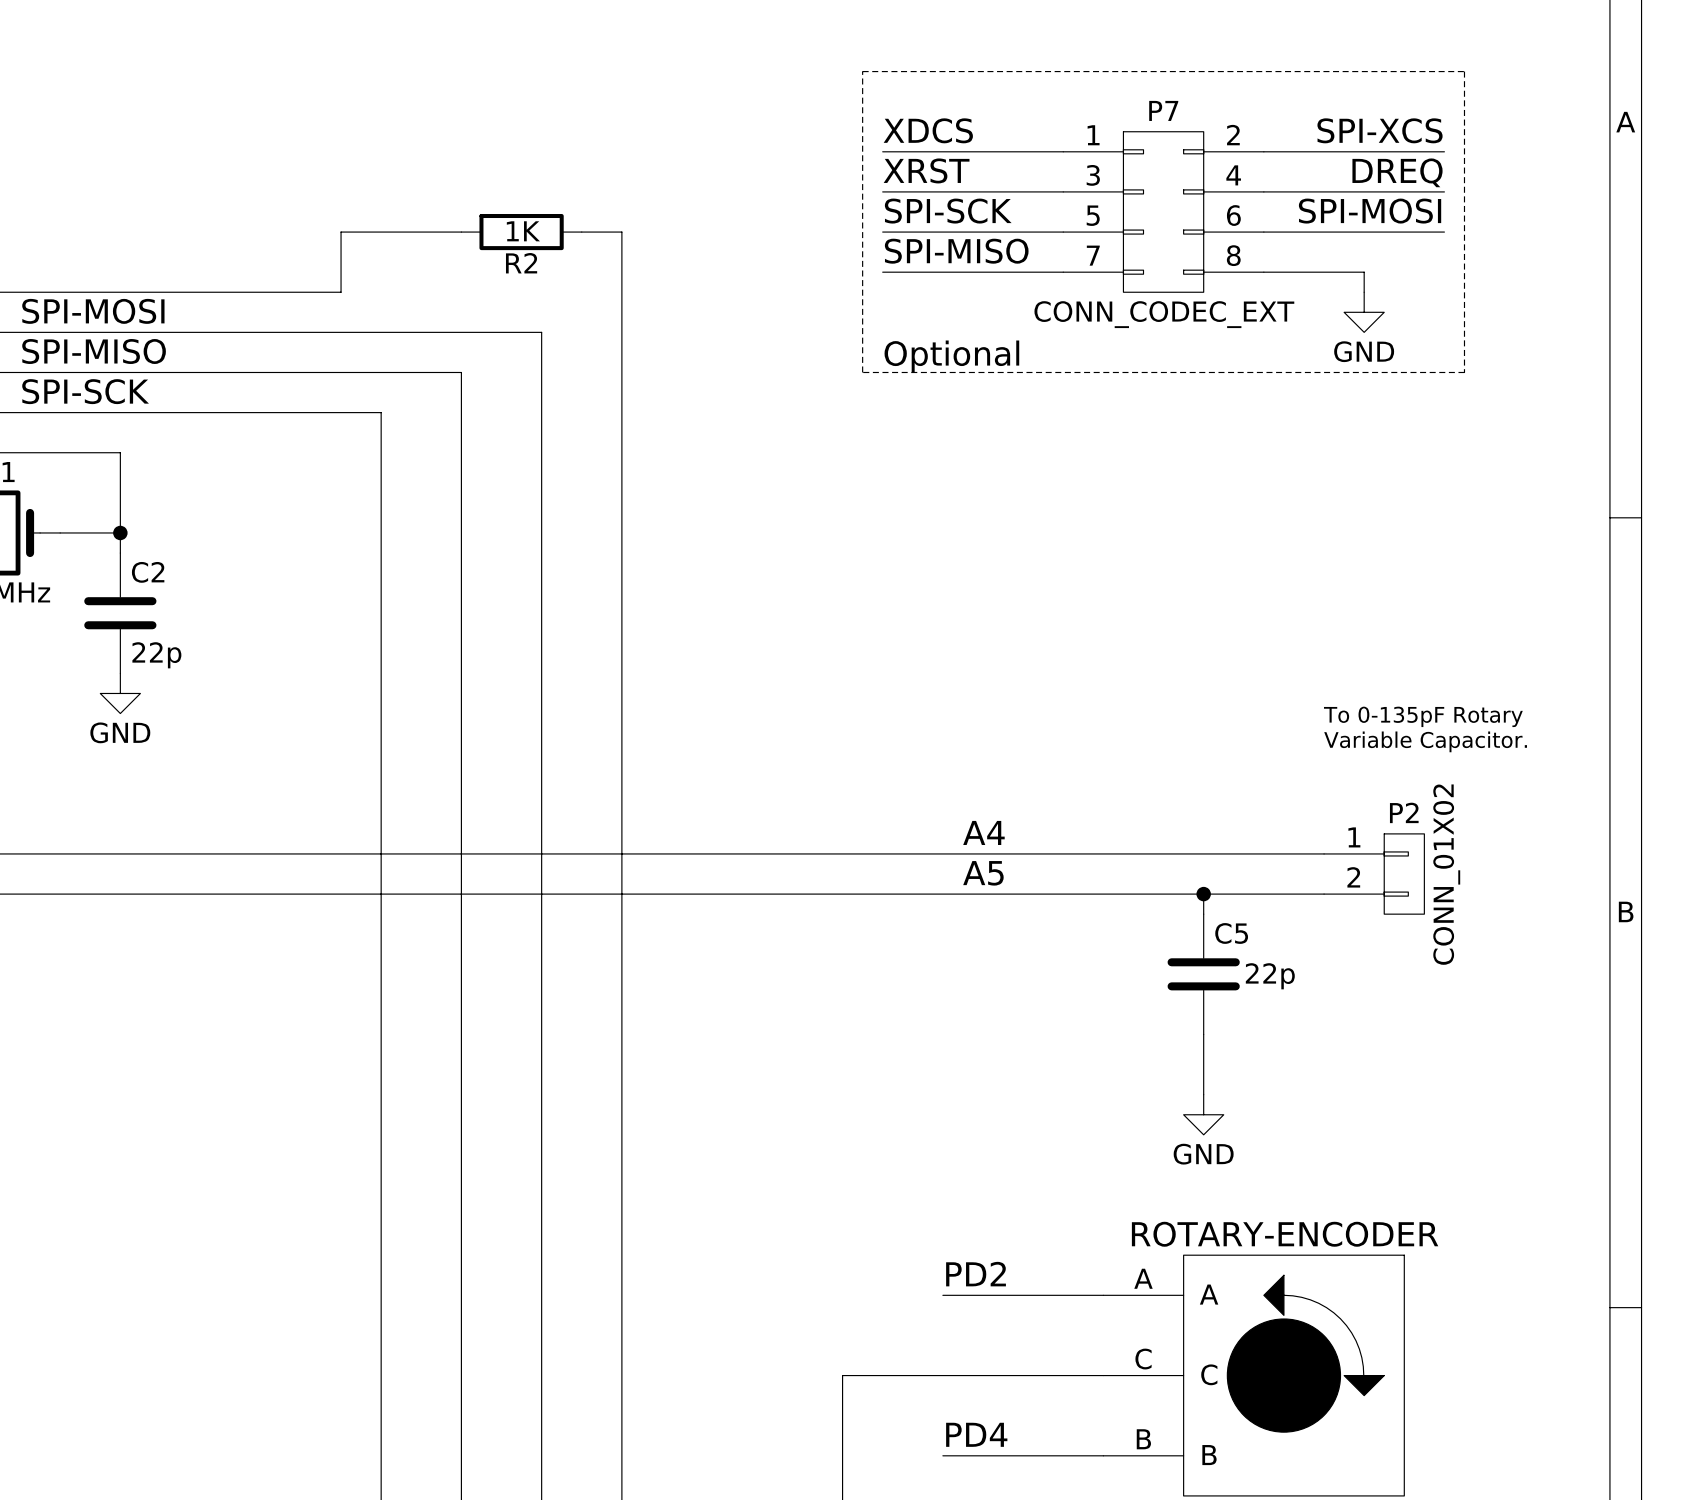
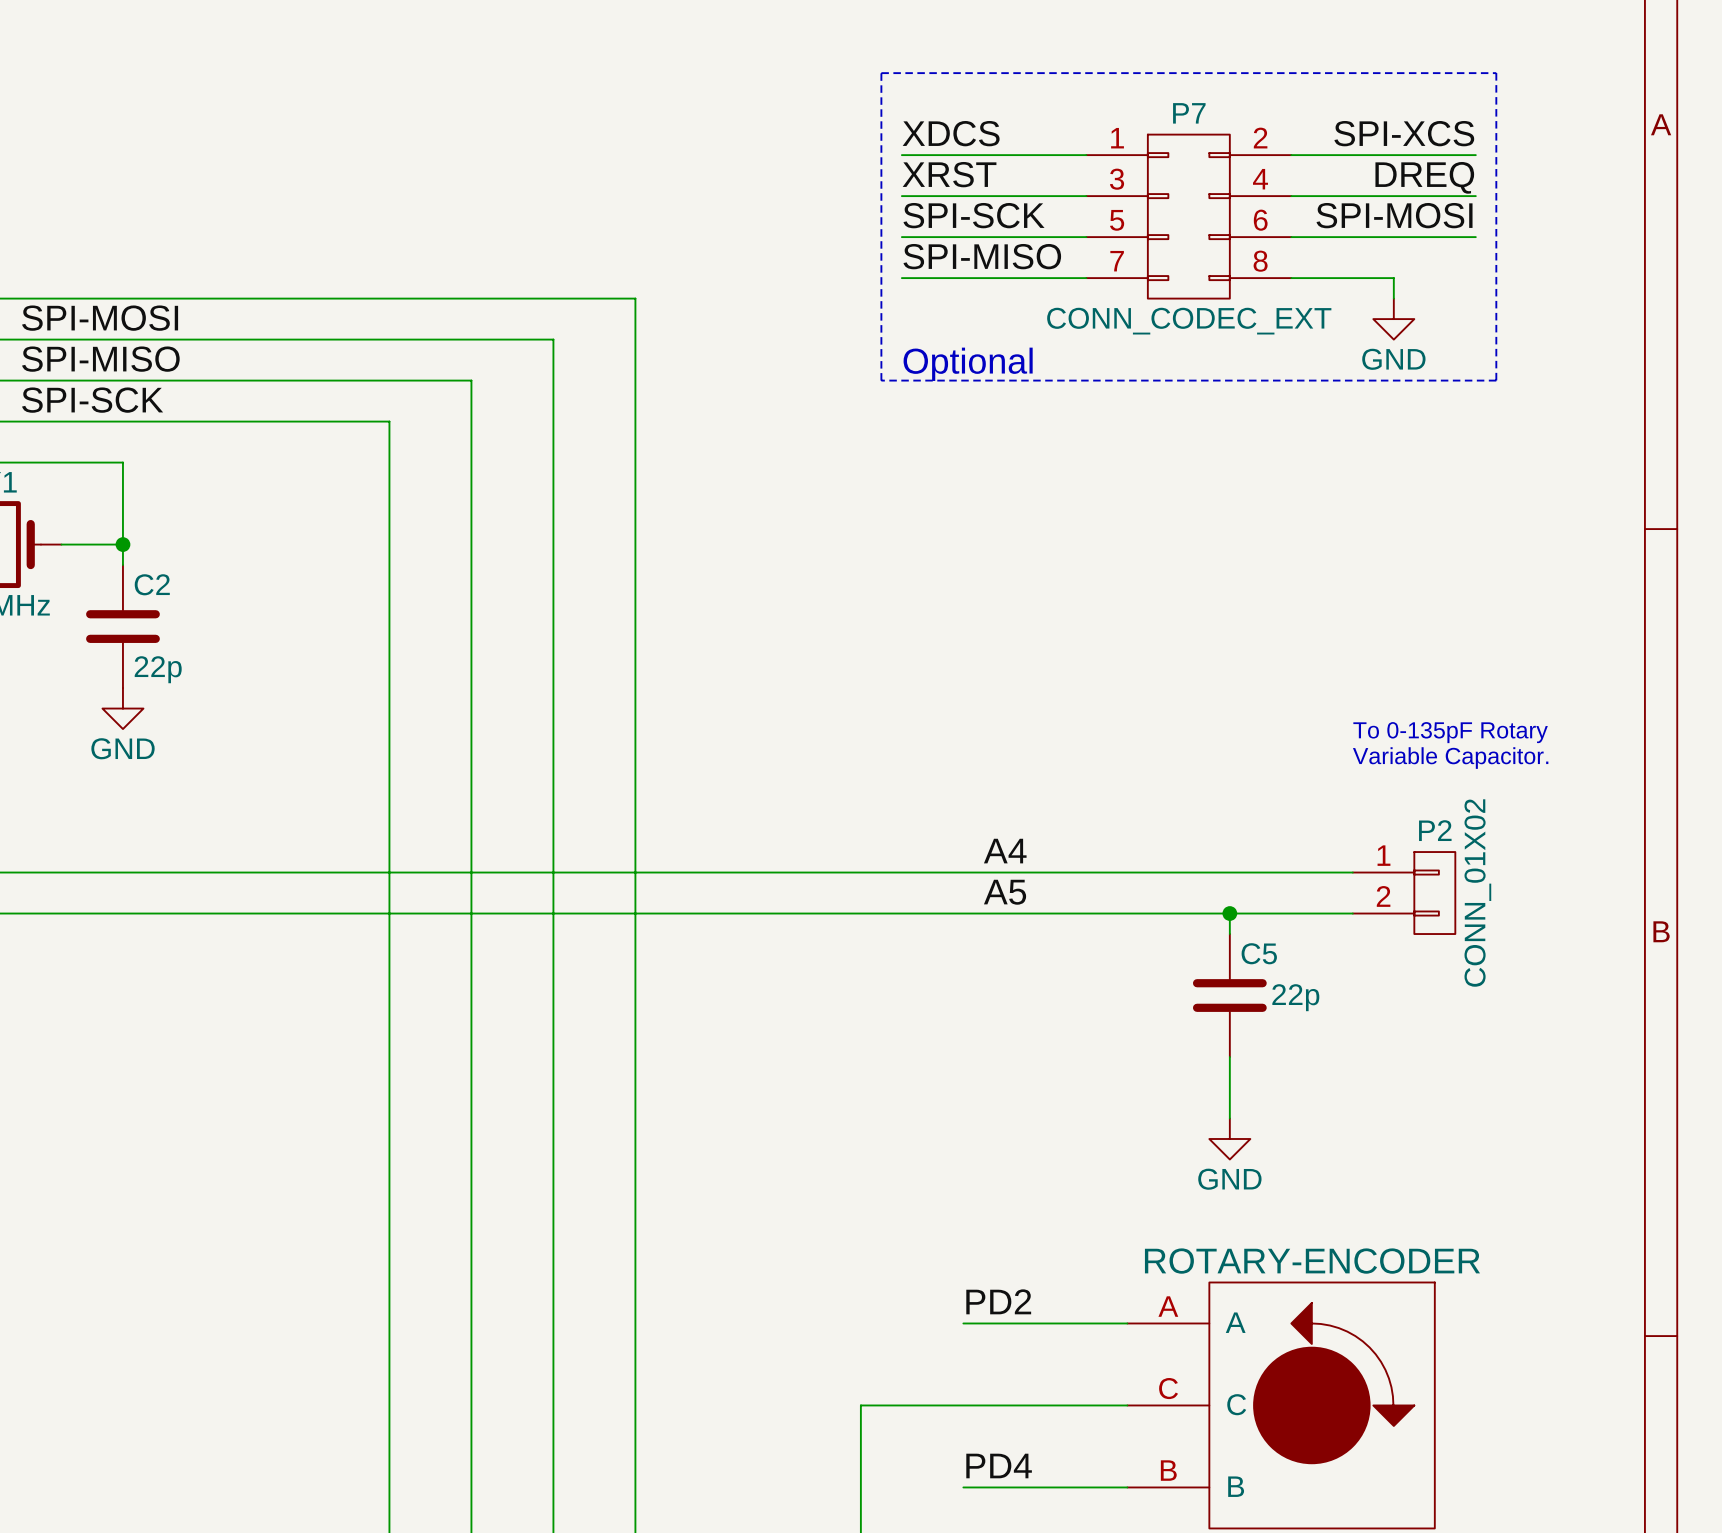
wire: (461, 232) (341, 232) (341, 292) -> (635, 298) (348, 298)
R2: 1K (521, 232) -> none
wire: (581, 232) (621, 232) (621, 292) -> none

